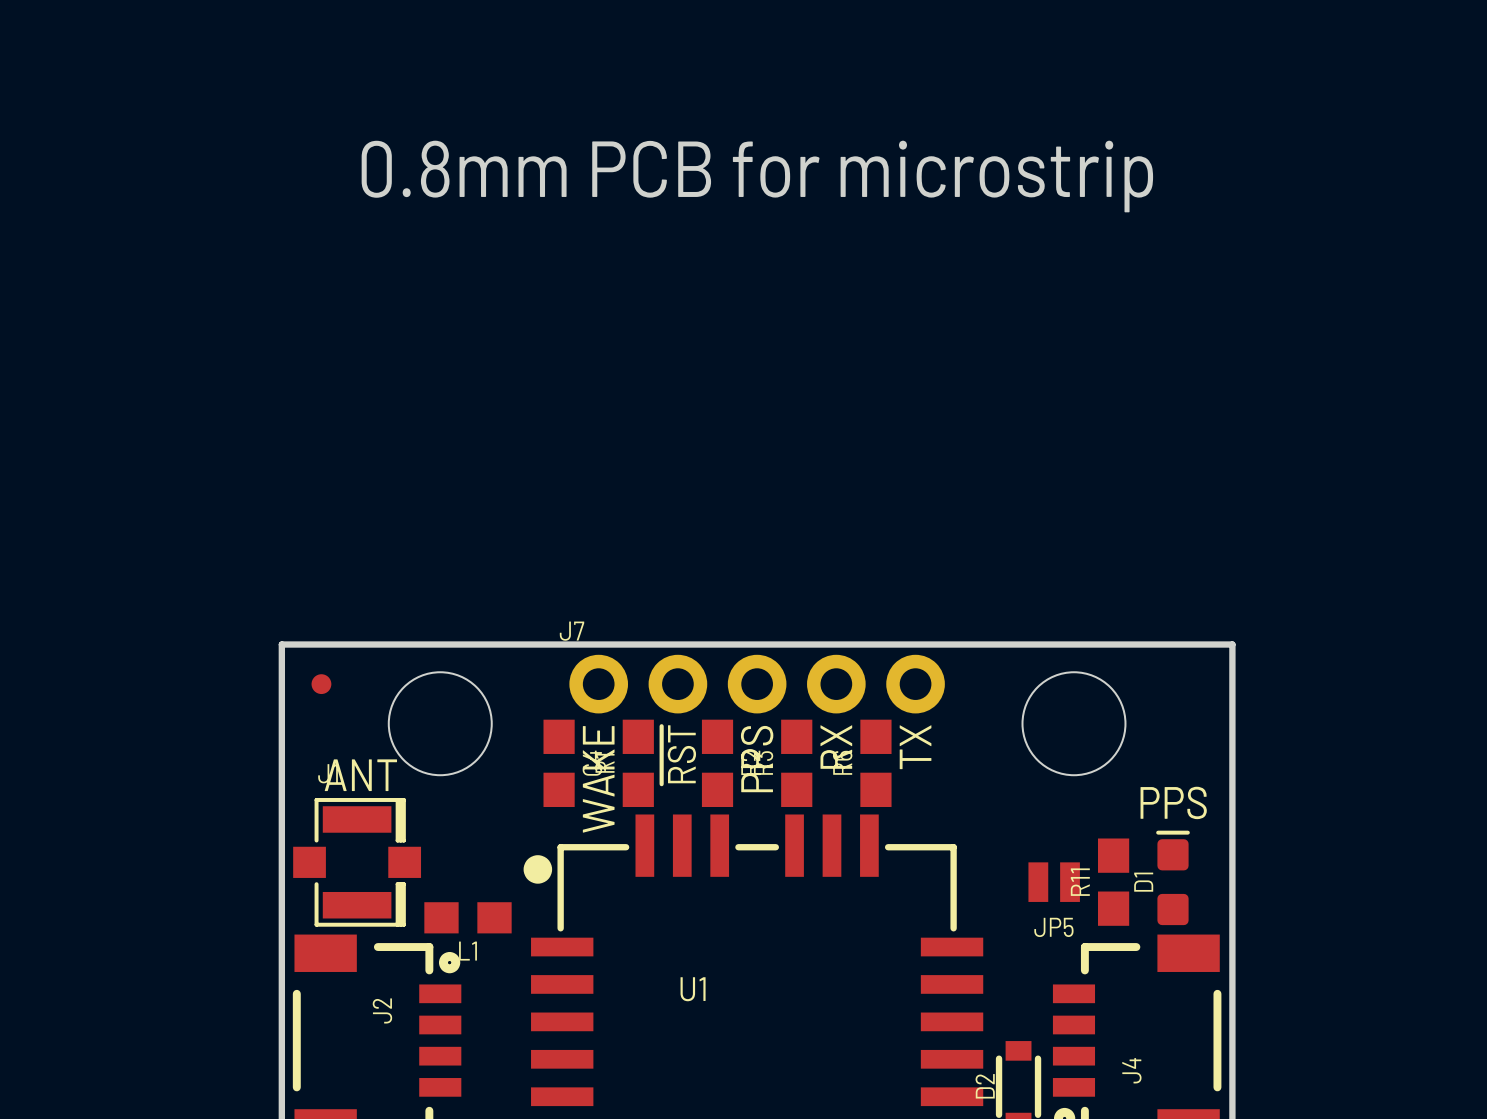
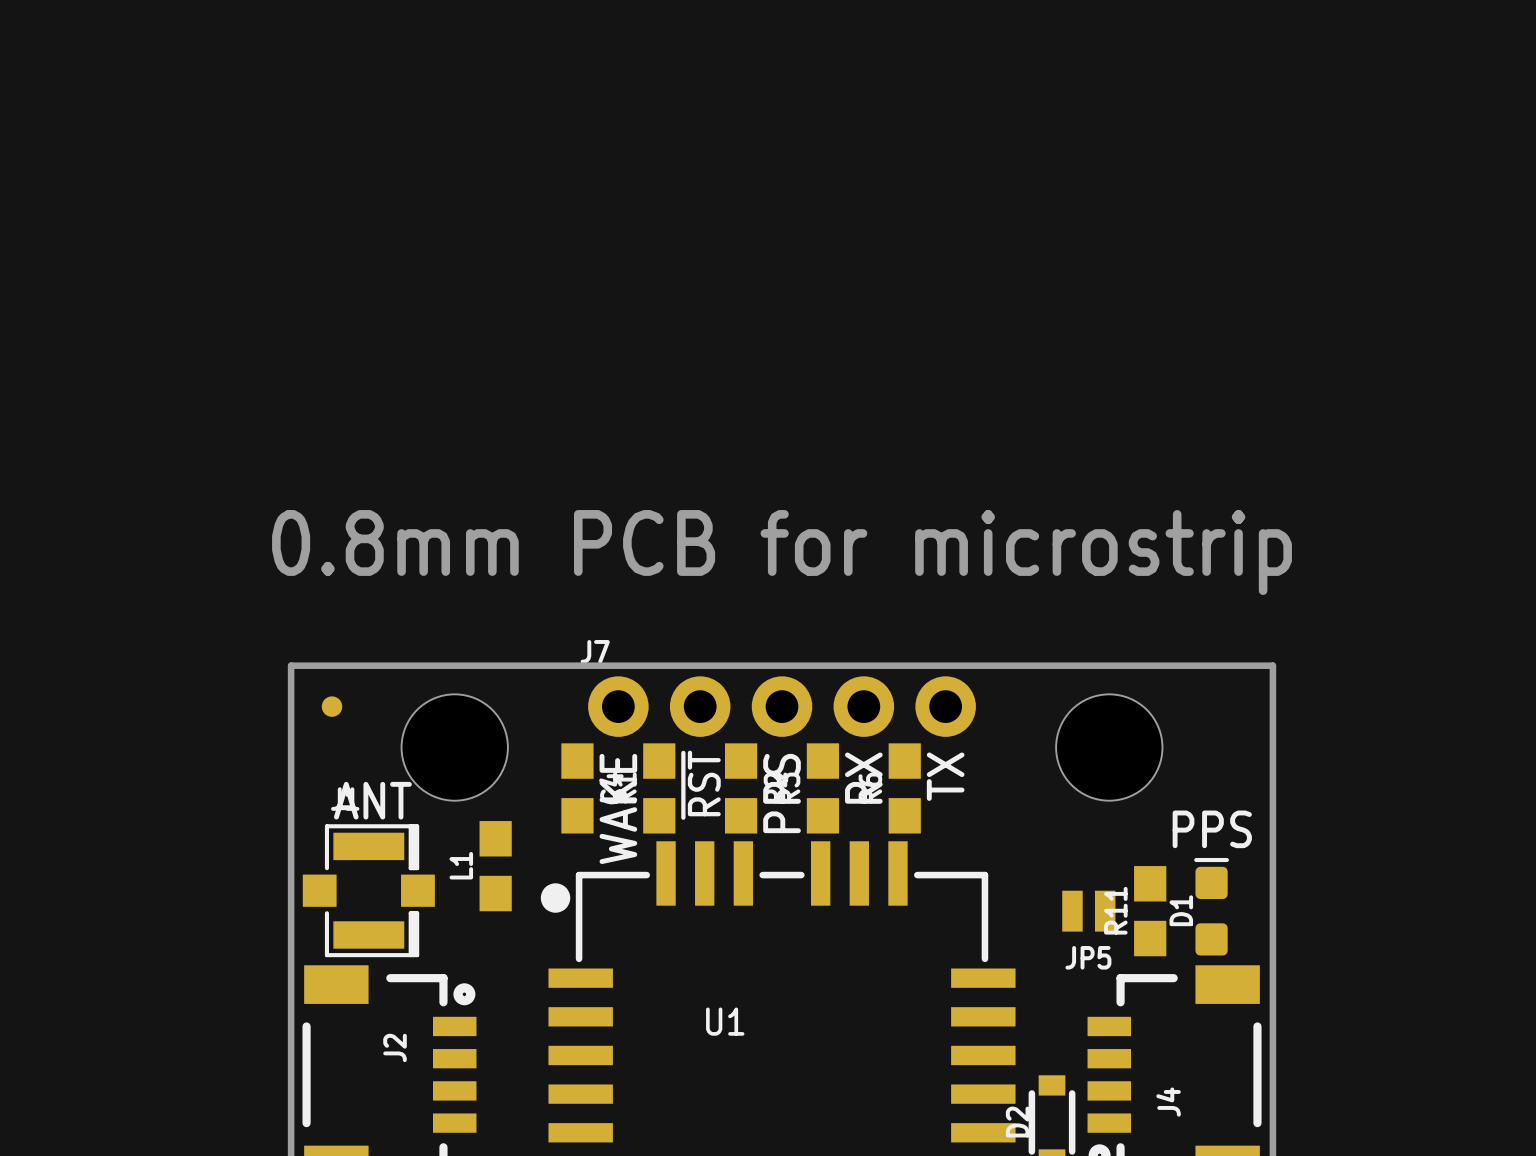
text position: 0.8mm PCB for microstrip (757, 176) -> 0.8mm PCB for microstrip (782, 552)
L1 rotation: 0° (467, 917) -> 90° clockwise (495, 866)
L1 position: (467, 917) -> (495, 866)

